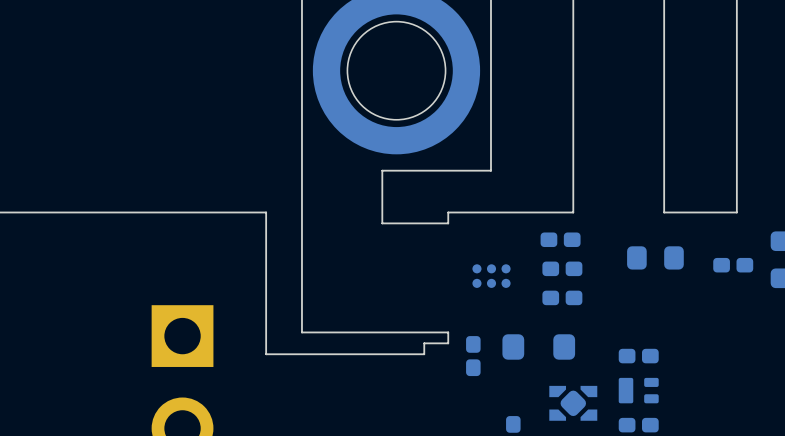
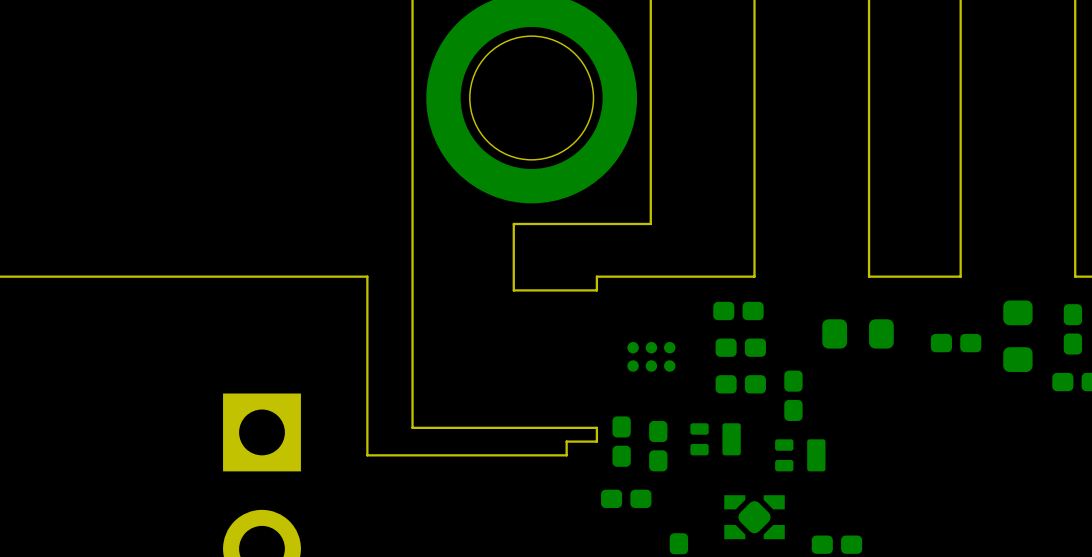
part footprint: [502, 334, 576, 360] -> [690, 423, 741, 456]
part: none -> (621, 441)
part: none -> (658, 446)
part: (473, 356) -> none
part rotation: 0° (638, 356) -> 90° clockwise (793, 395)
part position: (638, 356) -> (793, 395)
part: none -> (626, 498)
part rotation: 0° (638, 390) -> 180° (800, 455)
part position: (638, 390) -> (800, 455)

